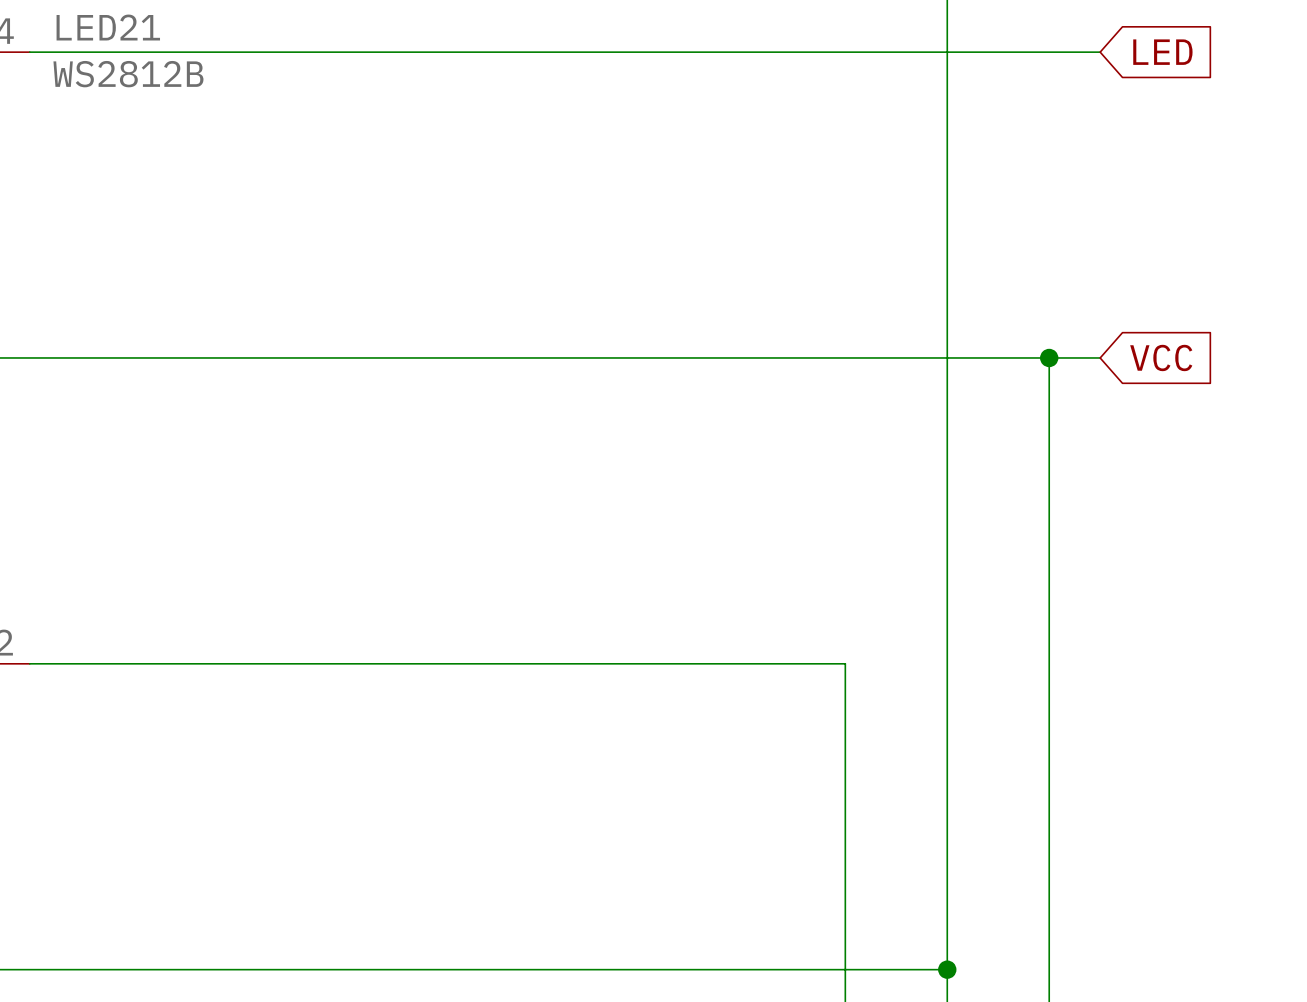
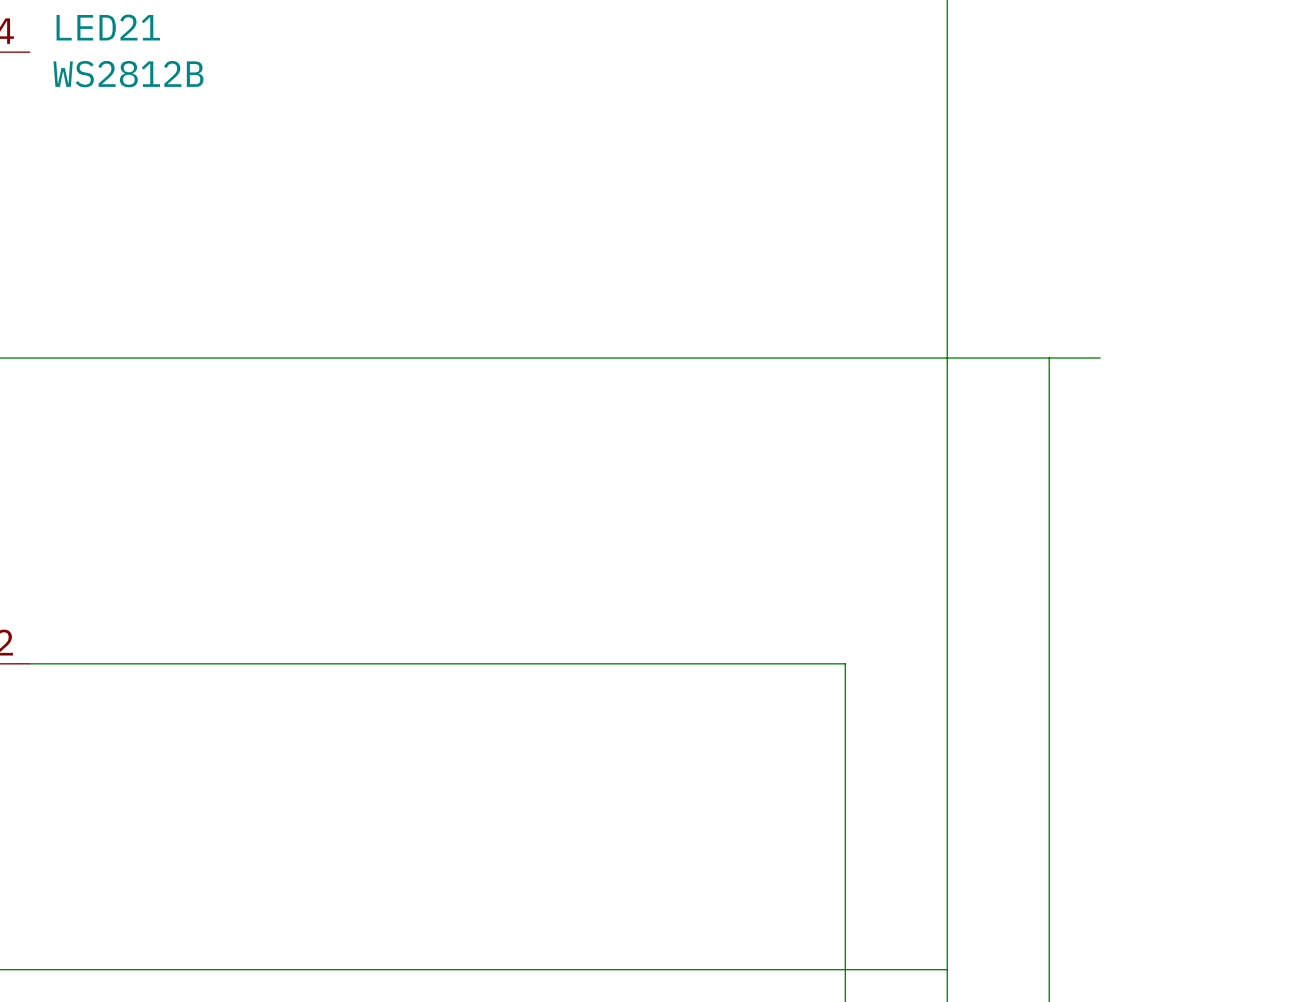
wire: (29, 52) (1100, 52) -> none
global label: LED (1162, 52) -> none
junction: (1049, 357) -> none
global label: VCC (1161, 357) -> none
junction: (947, 969) -> none

